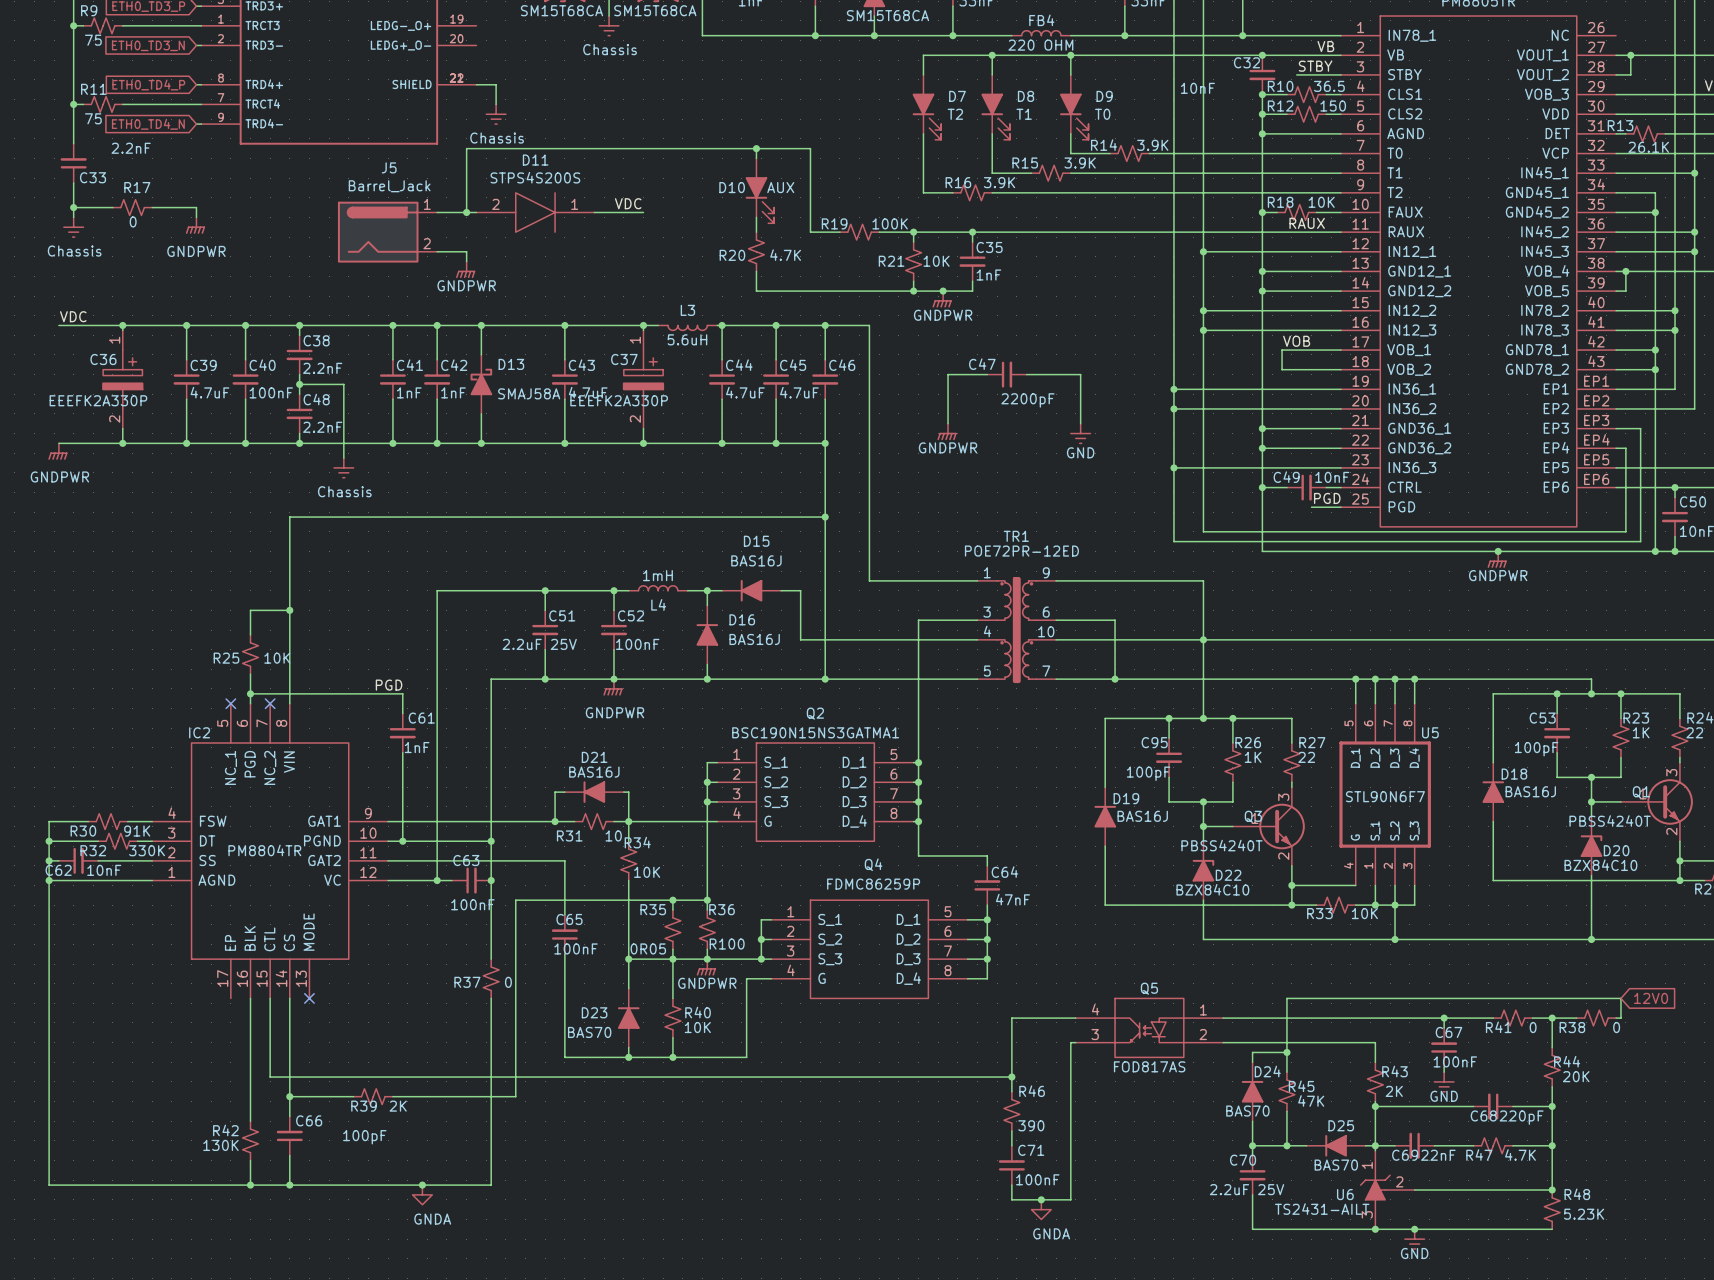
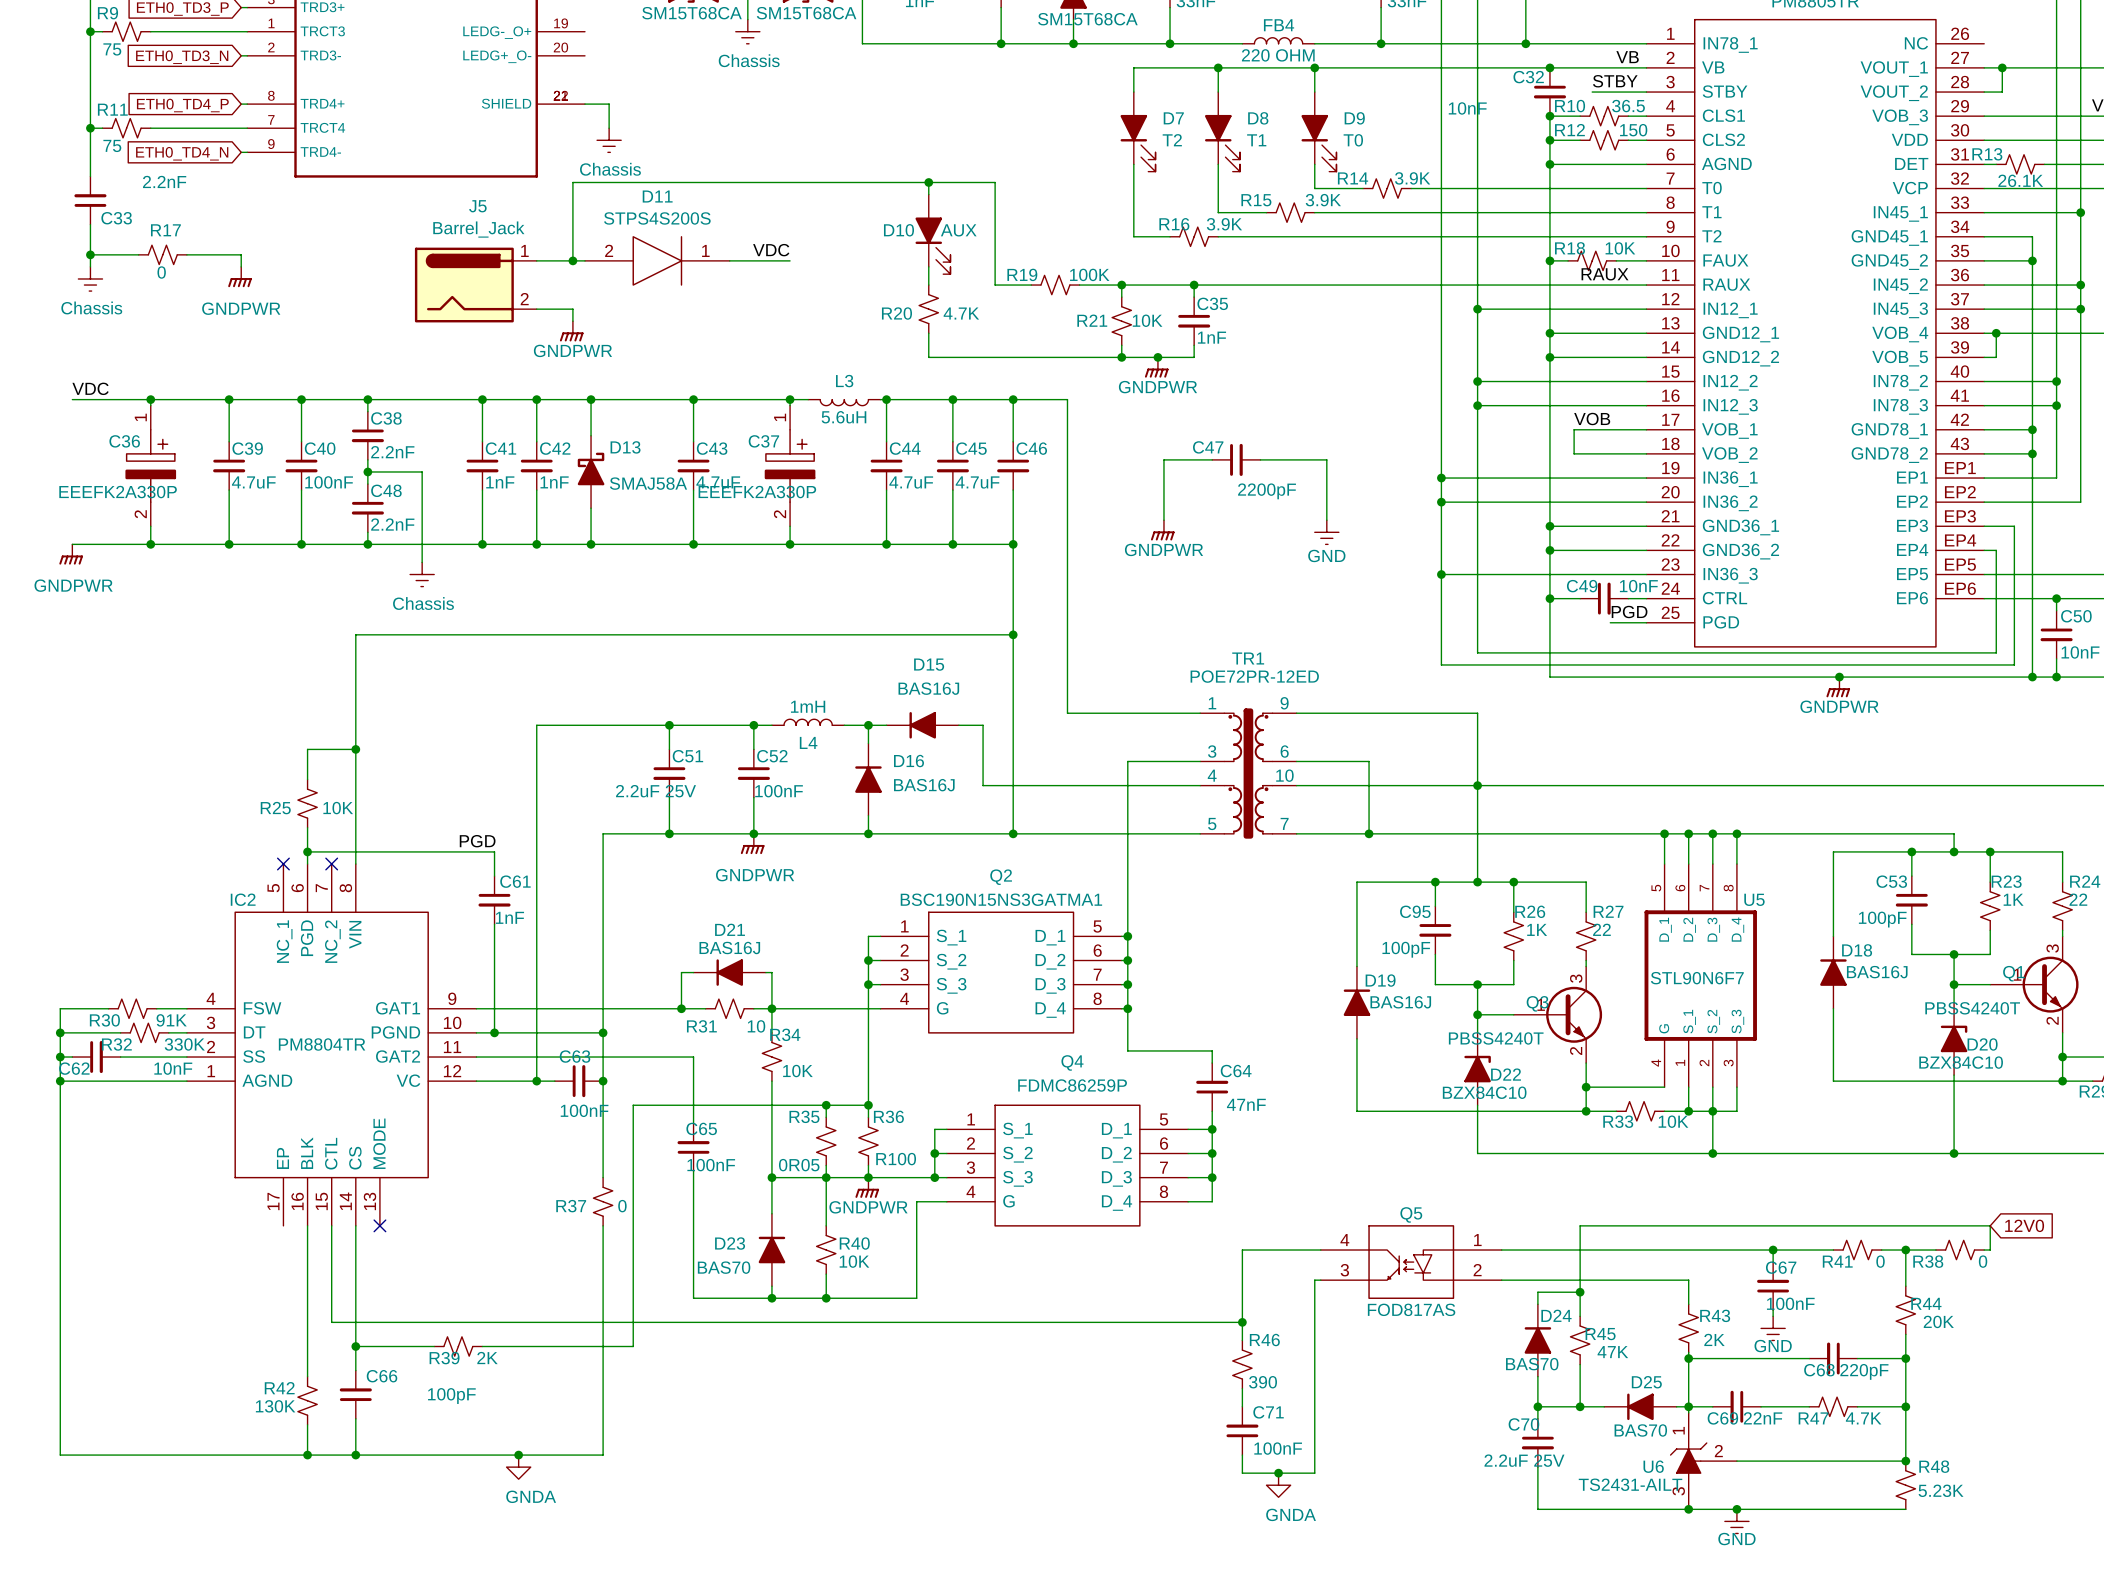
C62 value position: 10nF (104, 870) -> 10nF (173, 1068)

